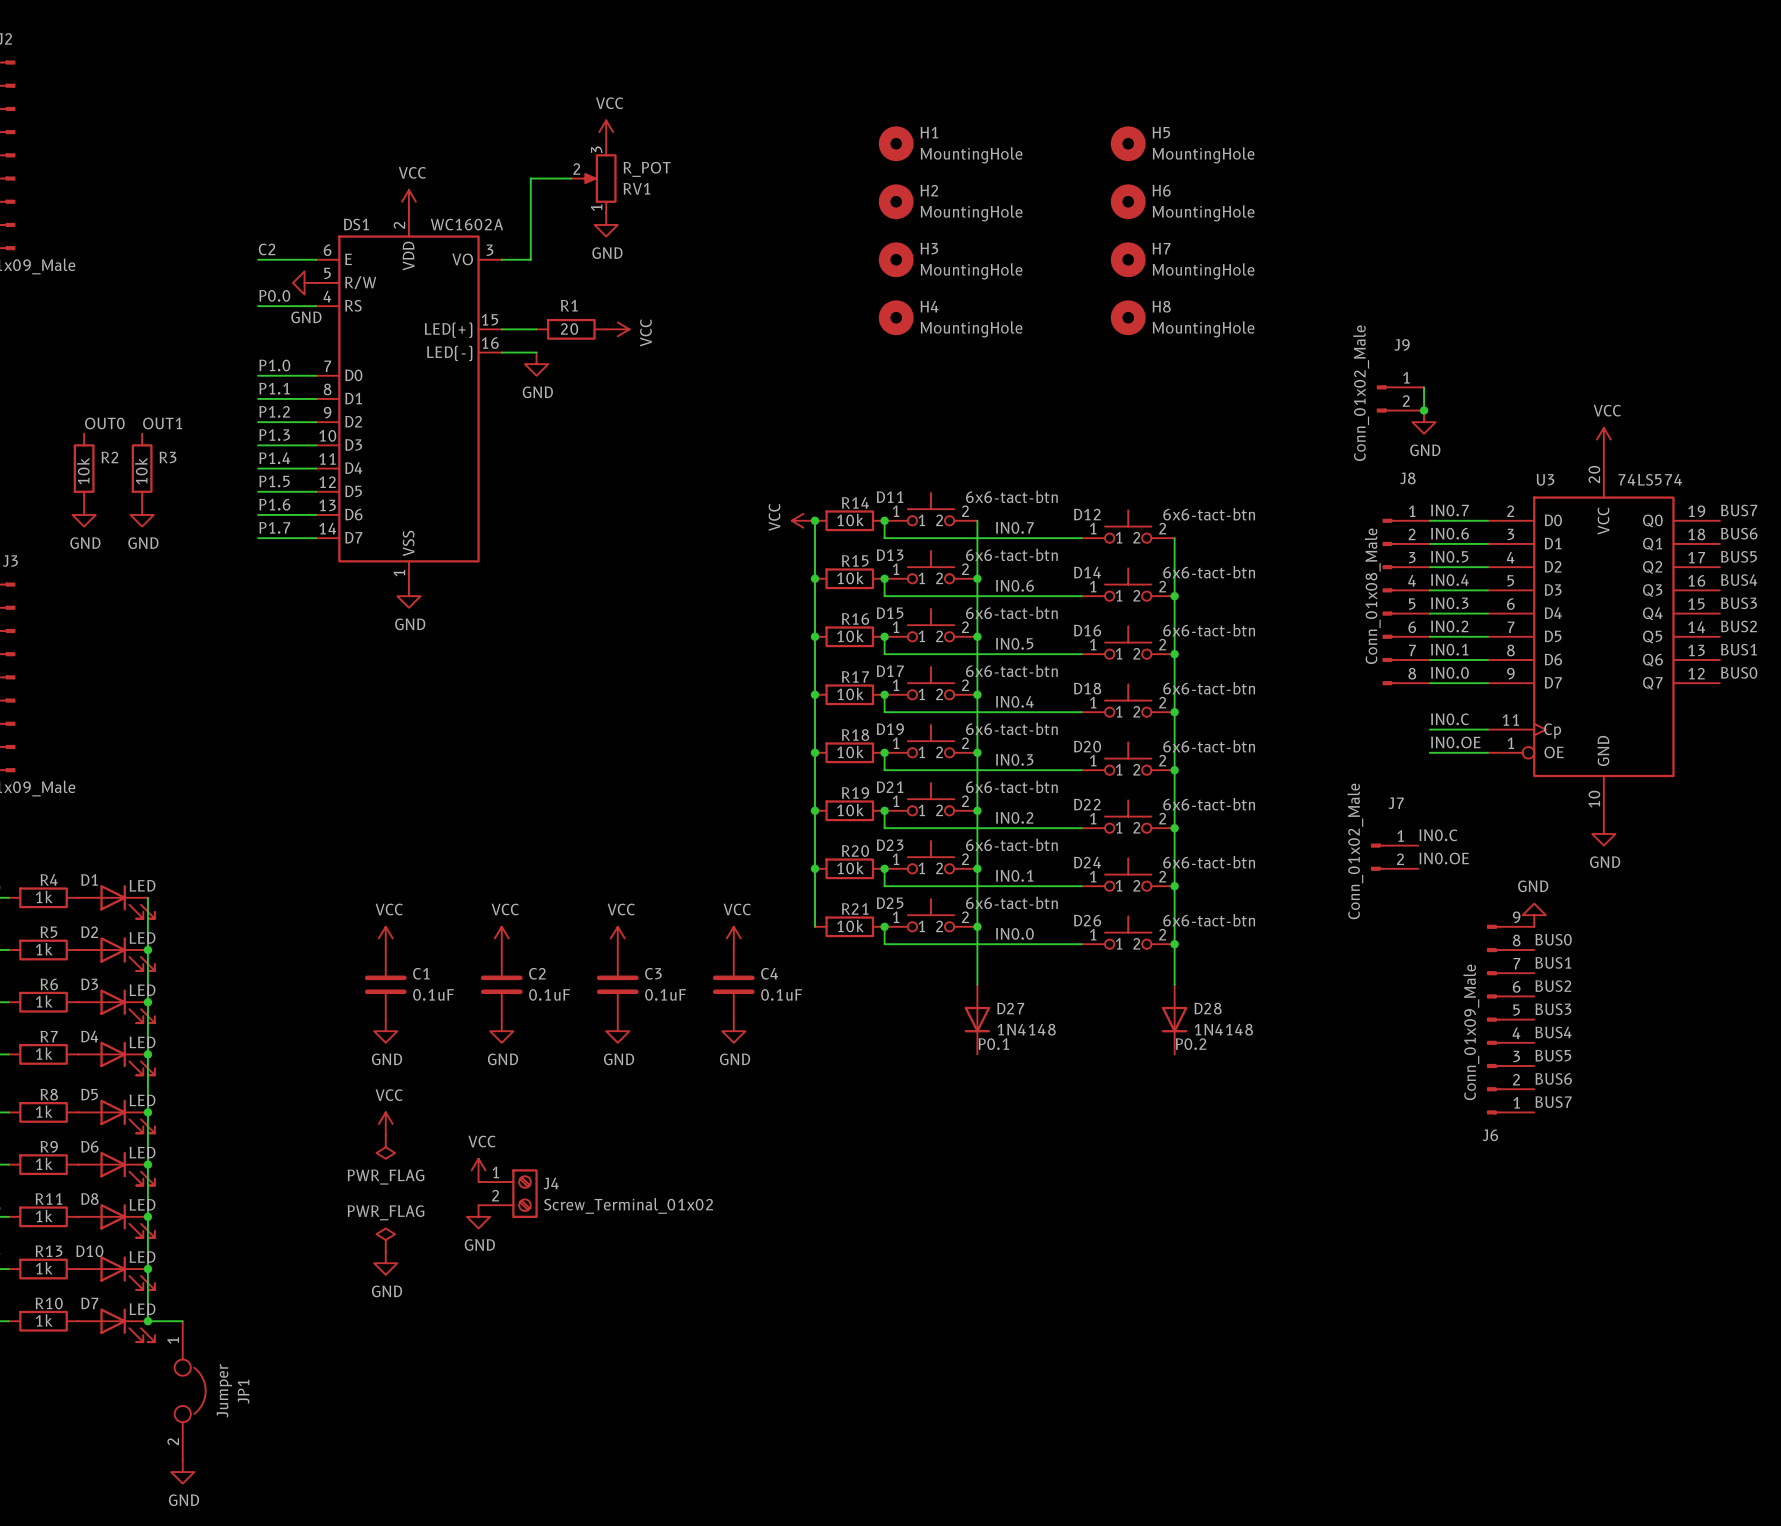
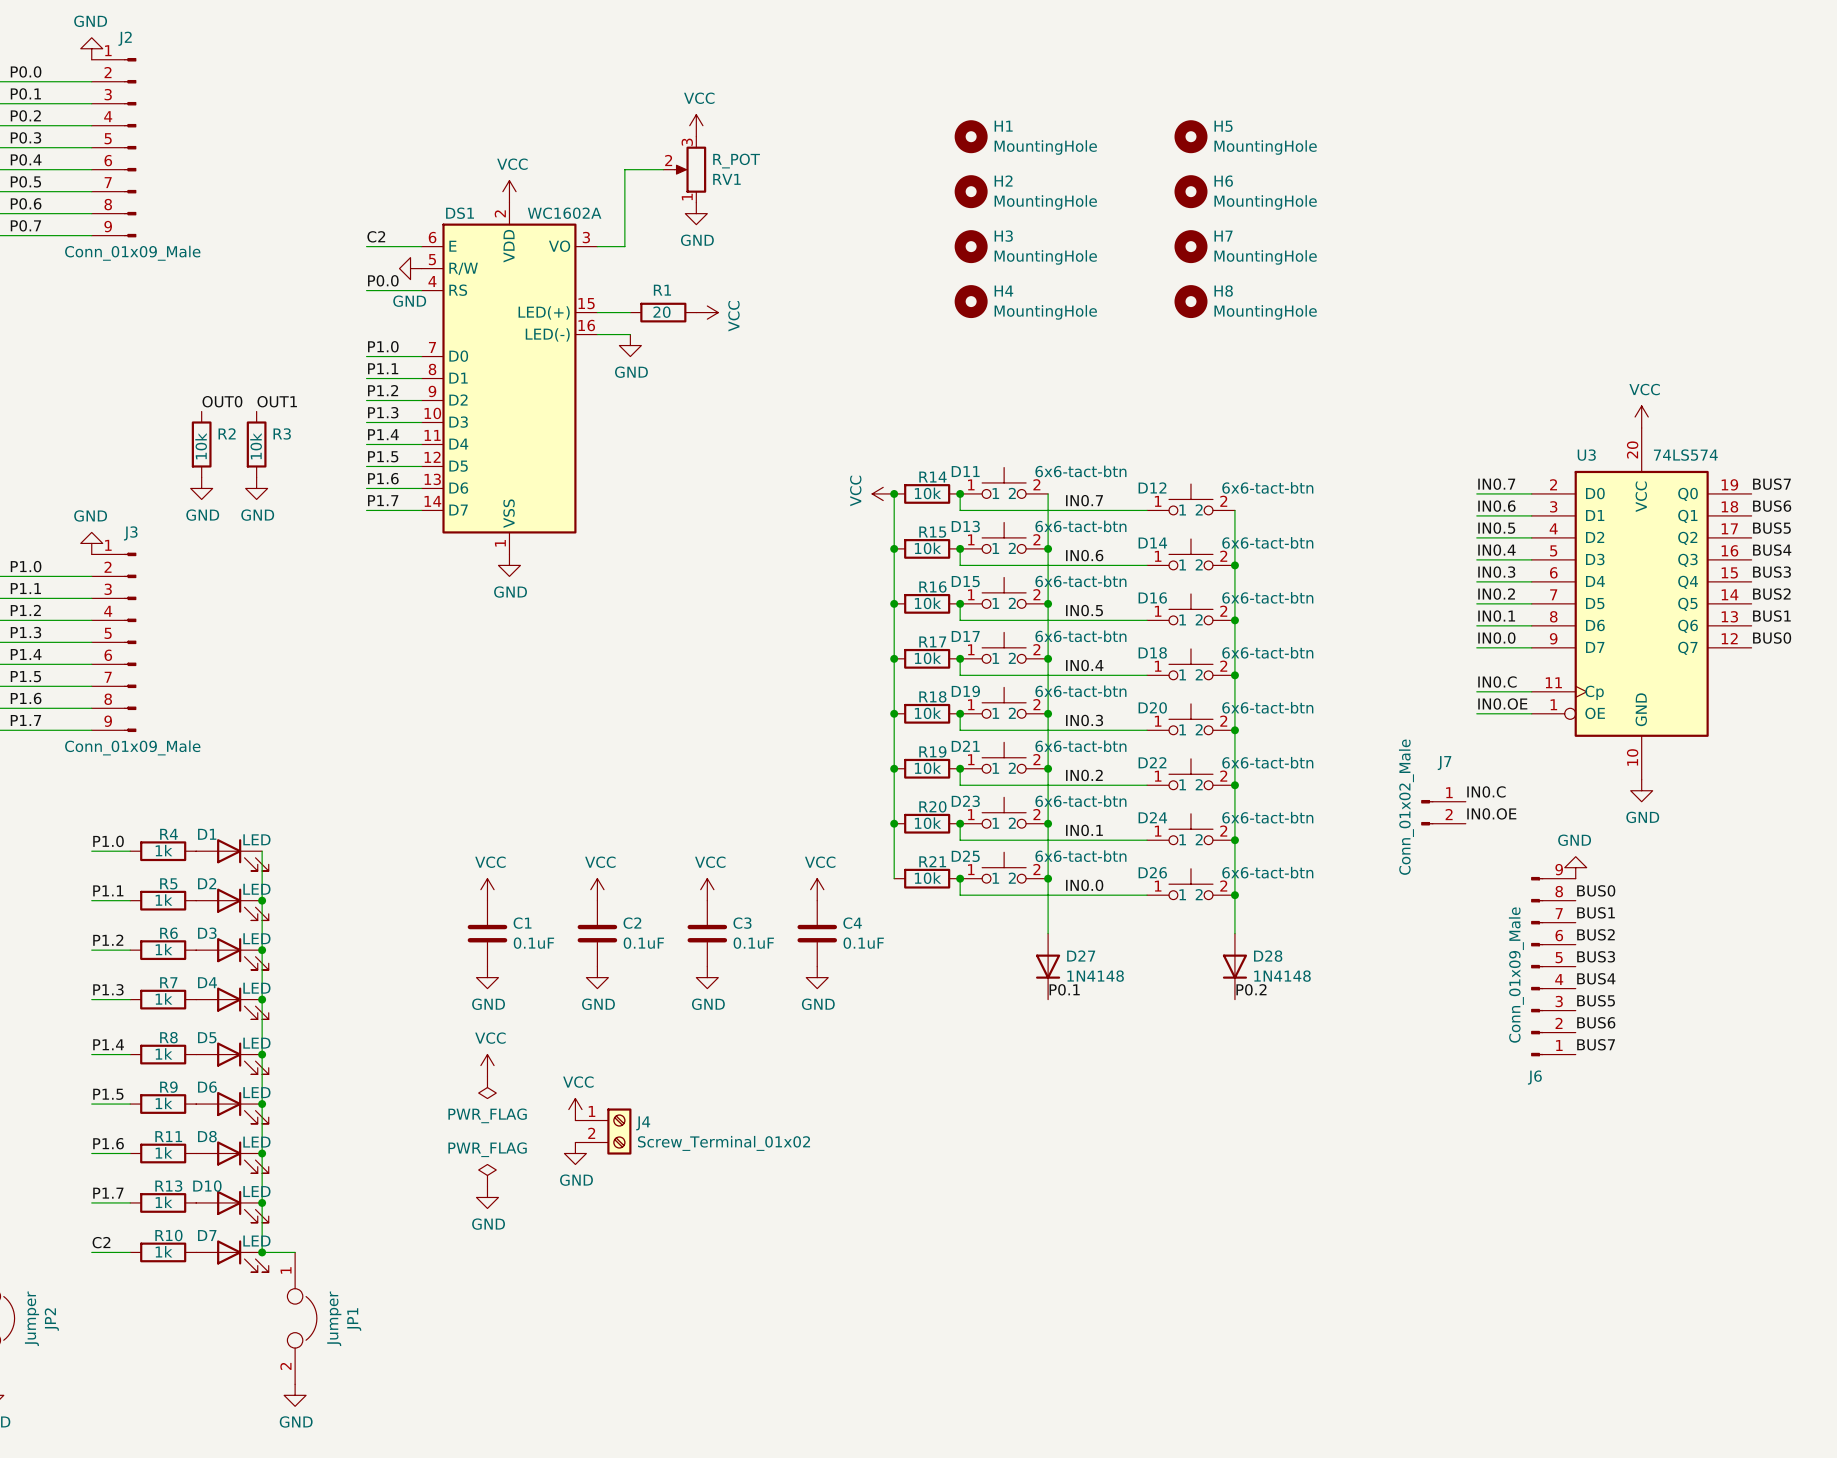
wire: (1424, 387) (1424, 410) -> none
J9: Conn_01x02_Male (1400, 398) -> none
junction: (1424, 410) -> none
power symbol: GND (1424, 422) -> none
J8: Conn_01x08_Male (1406, 601) -> none

